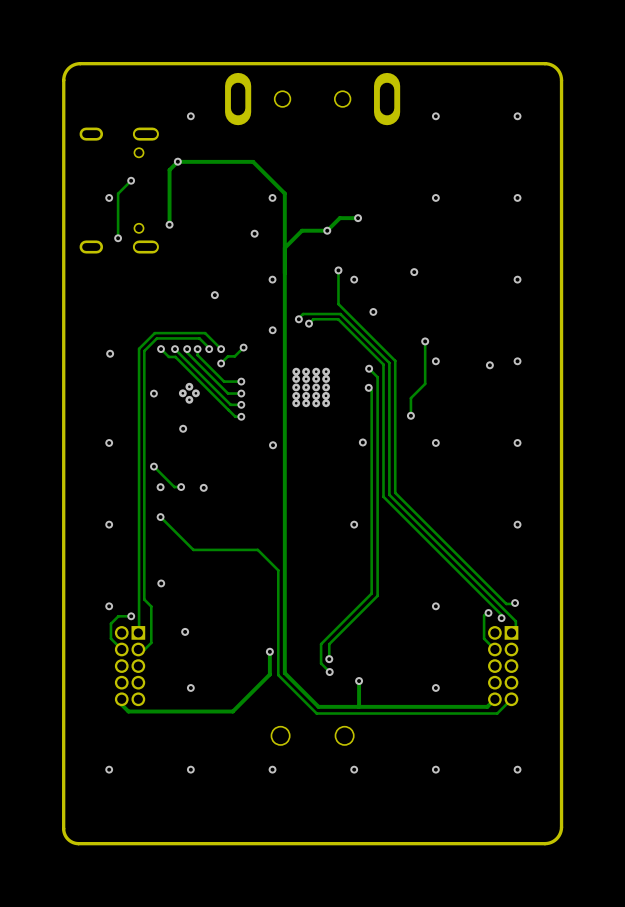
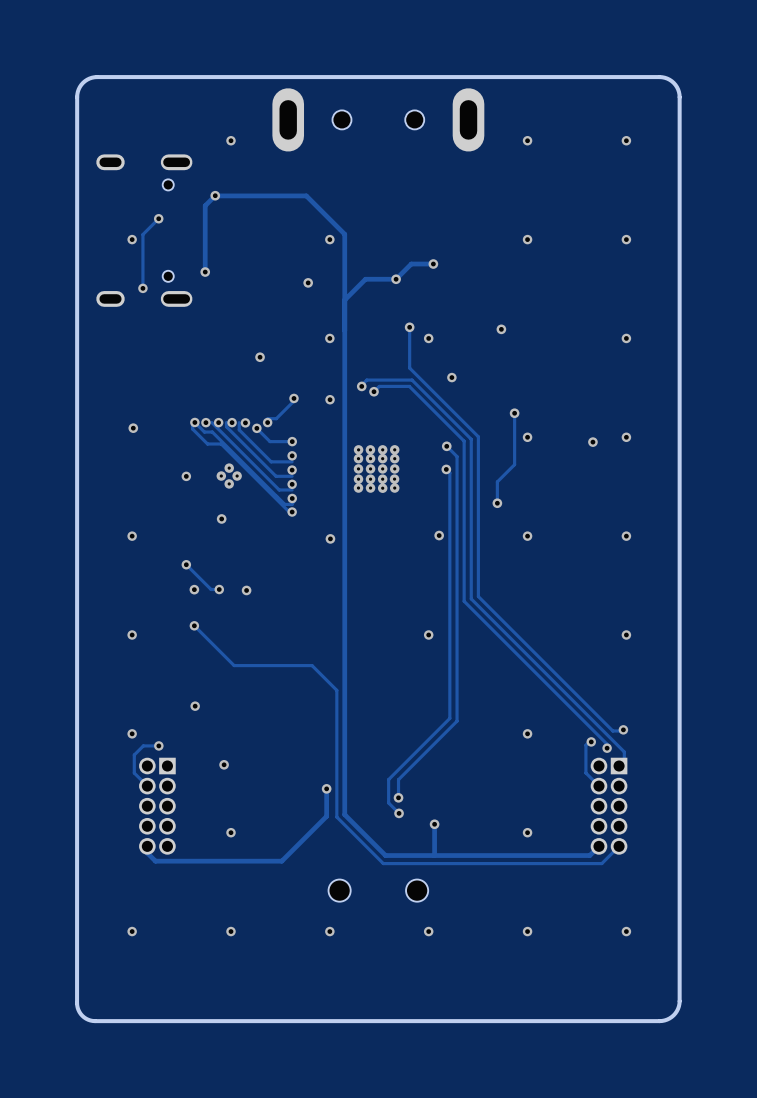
track: none -> (293, 398) (293, 401) (276, 418) (267, 418)
via: none -> (293, 398)
track: (243, 347) (234, 356) (227, 356) (221, 363) -> none
via: (243, 347) -> none
track: none -> (192, 422) (192, 428) (207, 443) (221, 443) (289, 512) (292, 512)
via: none -> (205, 422)
via: (175, 349) -> none
via: none -> (218, 422)
via: (187, 349) -> none
via: none -> (232, 422)
via: (197, 349) -> none
via: none -> (245, 422)
track: (209, 349) (199, 338) (156, 338) (144, 351) (144, 599) (151, 606) (151, 642) (144, 649) (138, 649) -> none
via: (209, 349) -> none
track: (221, 349) (205, 333) (154, 333) (139, 348) (138, 632) -> none
via: none -> (256, 428)
track: none -> (257, 429) (270, 441) (292, 441)
via: (221, 363) -> none
via: none -> (292, 441)
via: none -> (292, 455)
via: (241, 381) -> none
via: none -> (292, 470)
via: (241, 393) -> none
via: none -> (292, 484)
via: (241, 404) -> none
via: none -> (292, 498)
via: (241, 416) -> none
via: none -> (292, 512)

